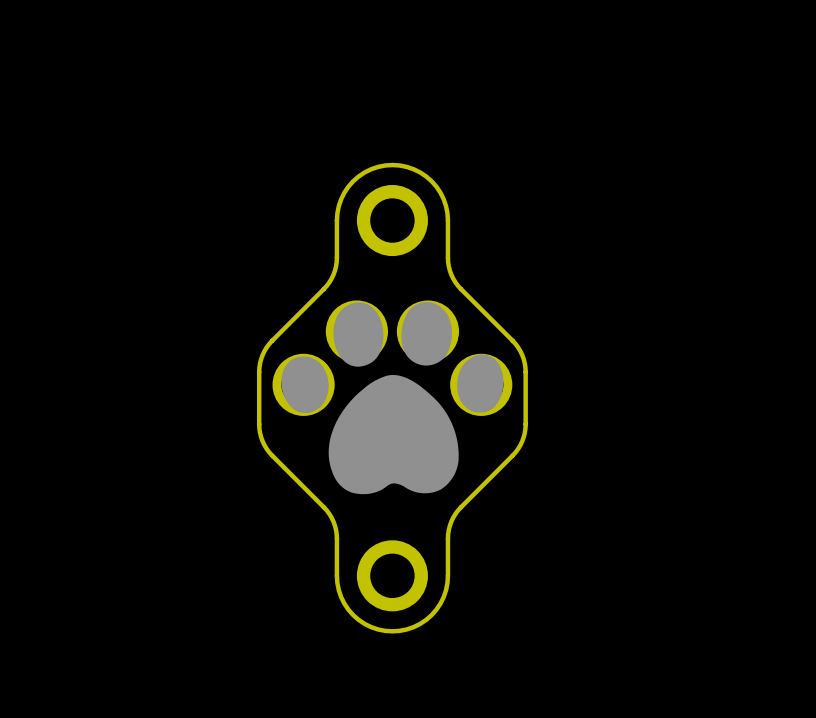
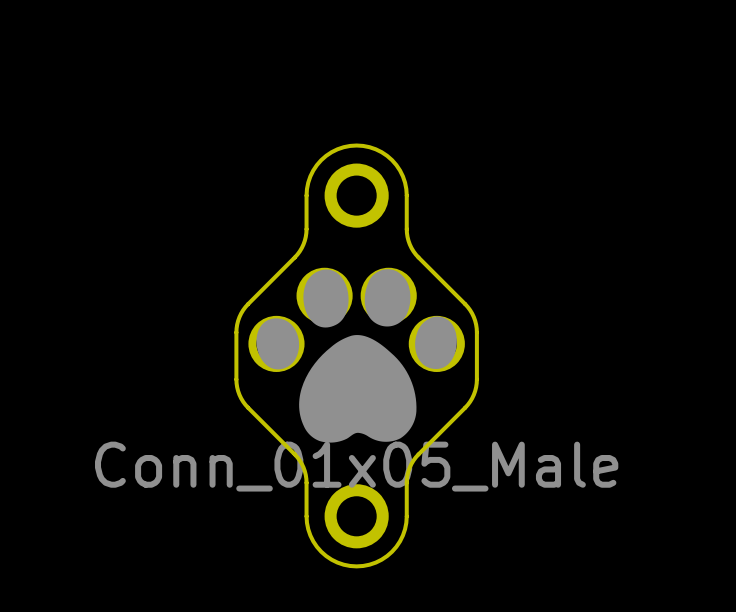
part value: none -> Conn_01x05_Male (356, 466)

